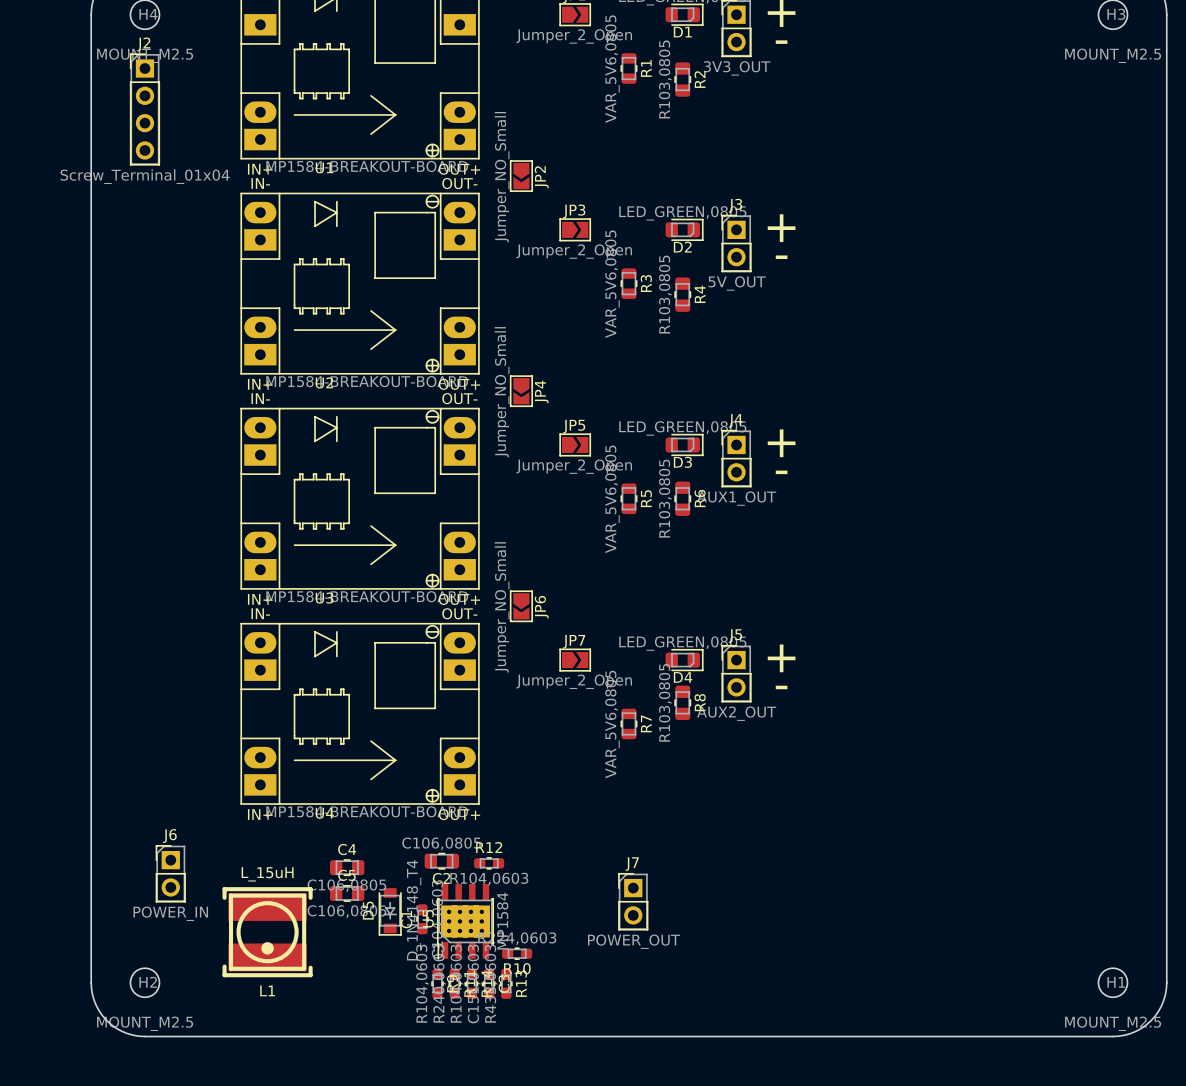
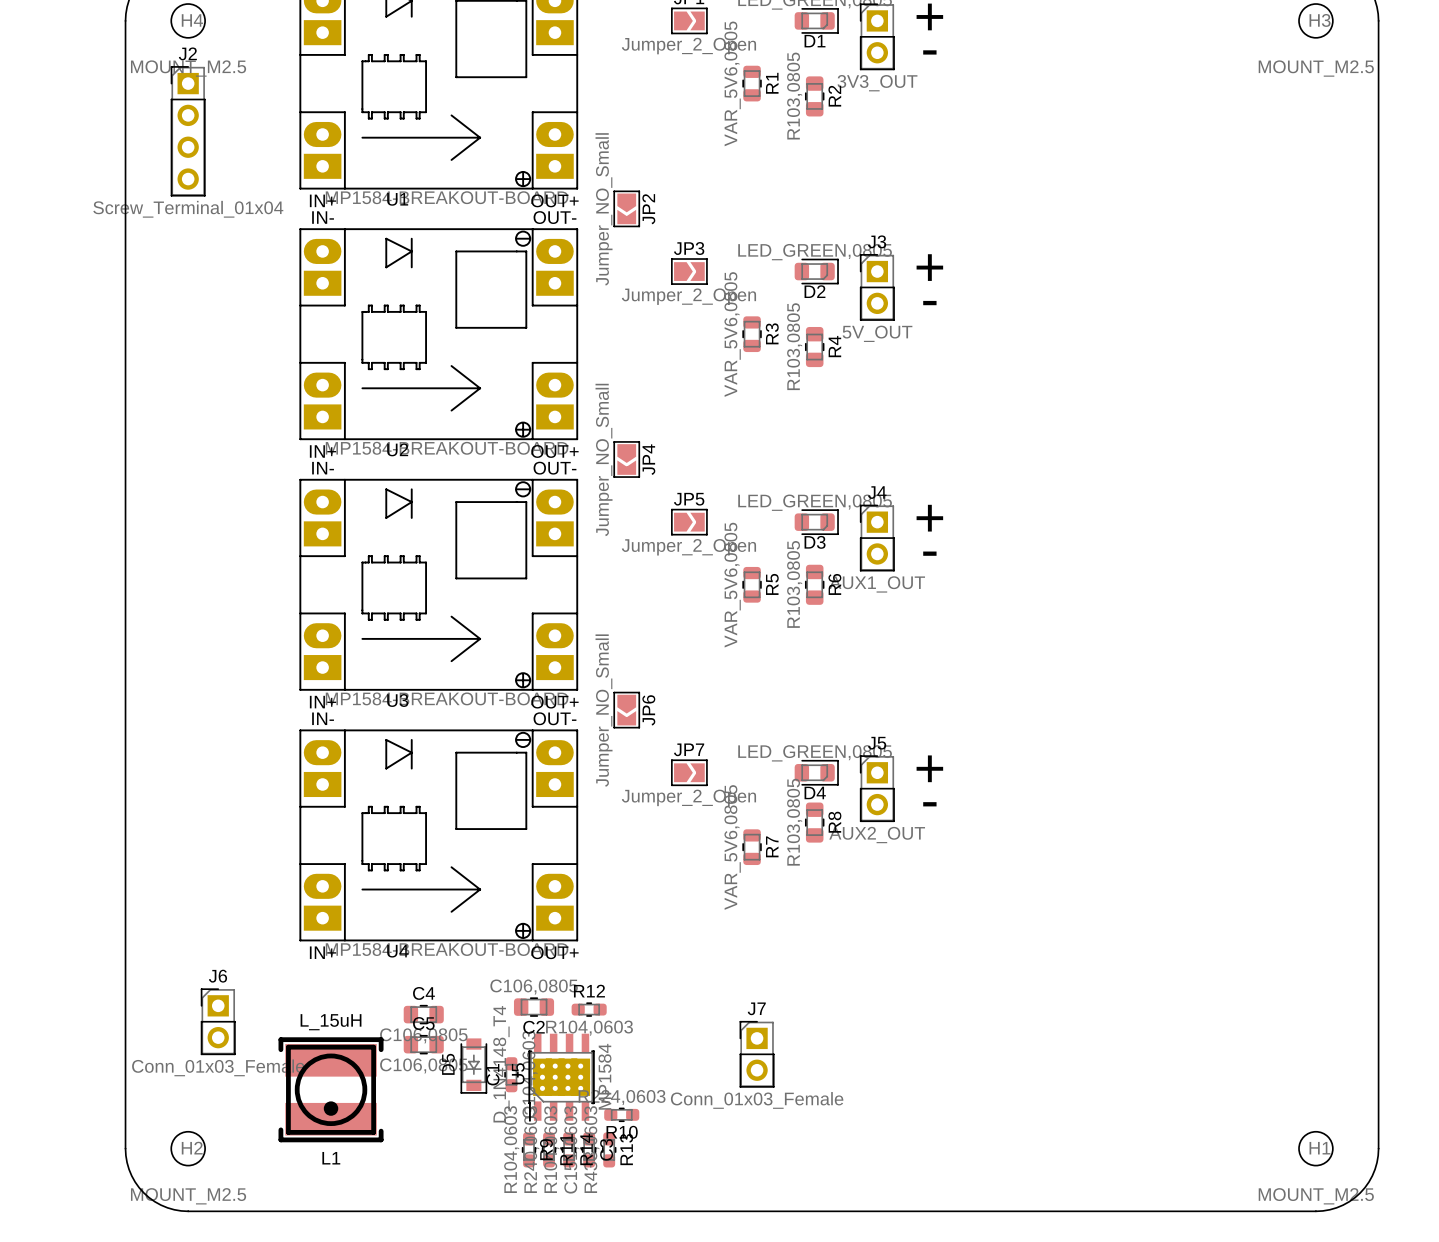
J6 value: POWER_IN (170, 913) -> Conn_01x03_Female (218, 1067)
J7 value: POWER_OUT (634, 941) -> Conn_01x03_Female (757, 1100)

